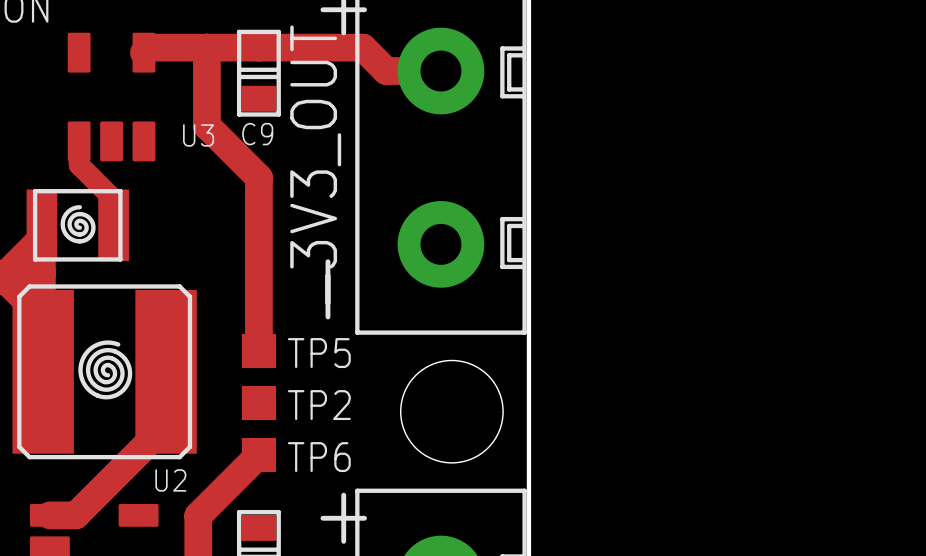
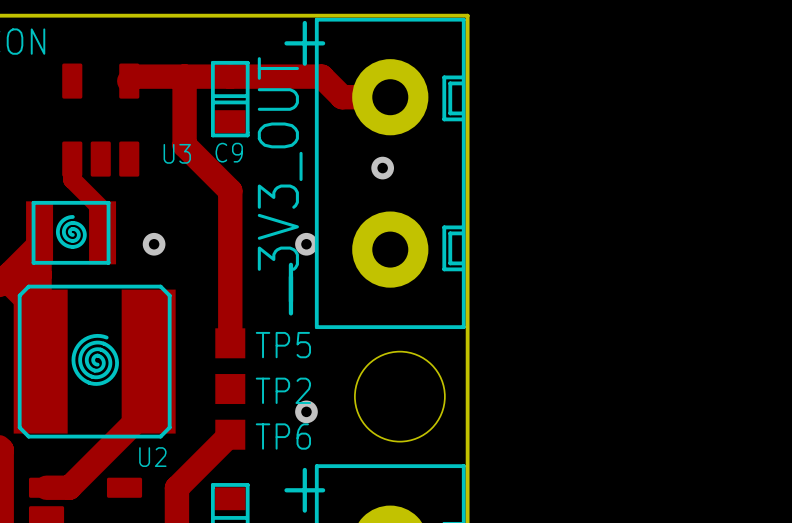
via: none -> (382, 168)
via: none -> (154, 244)
via: none -> (306, 244)
via: none -> (306, 411)

